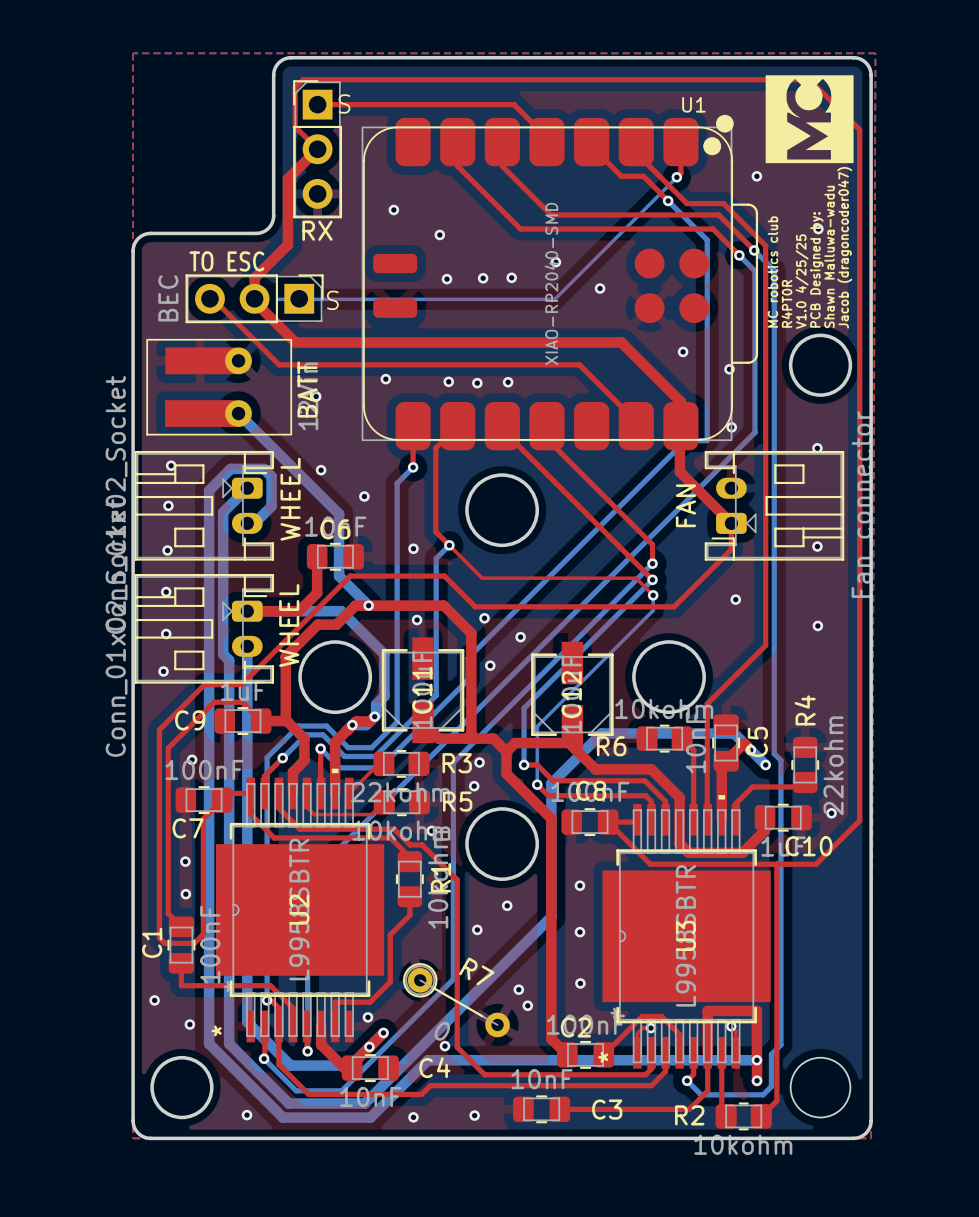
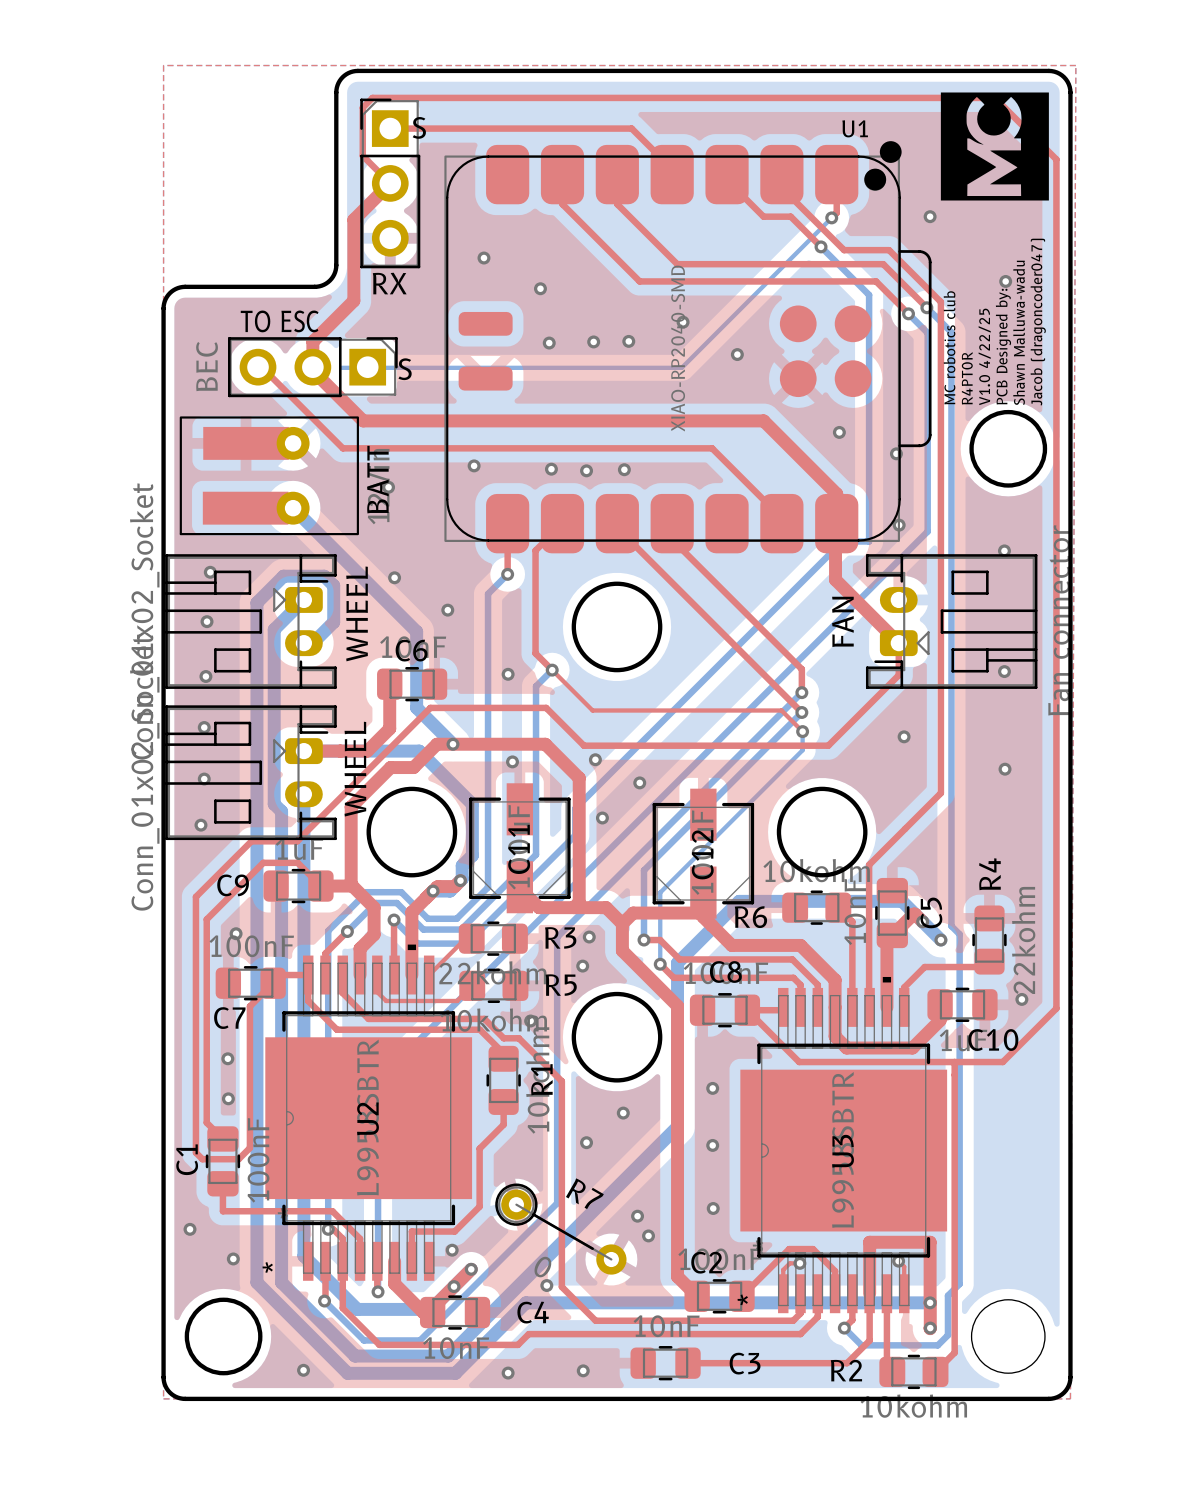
text: V1.0 4/25/25 (802, 281) -> V1.0 4/22/25 (984, 356)

